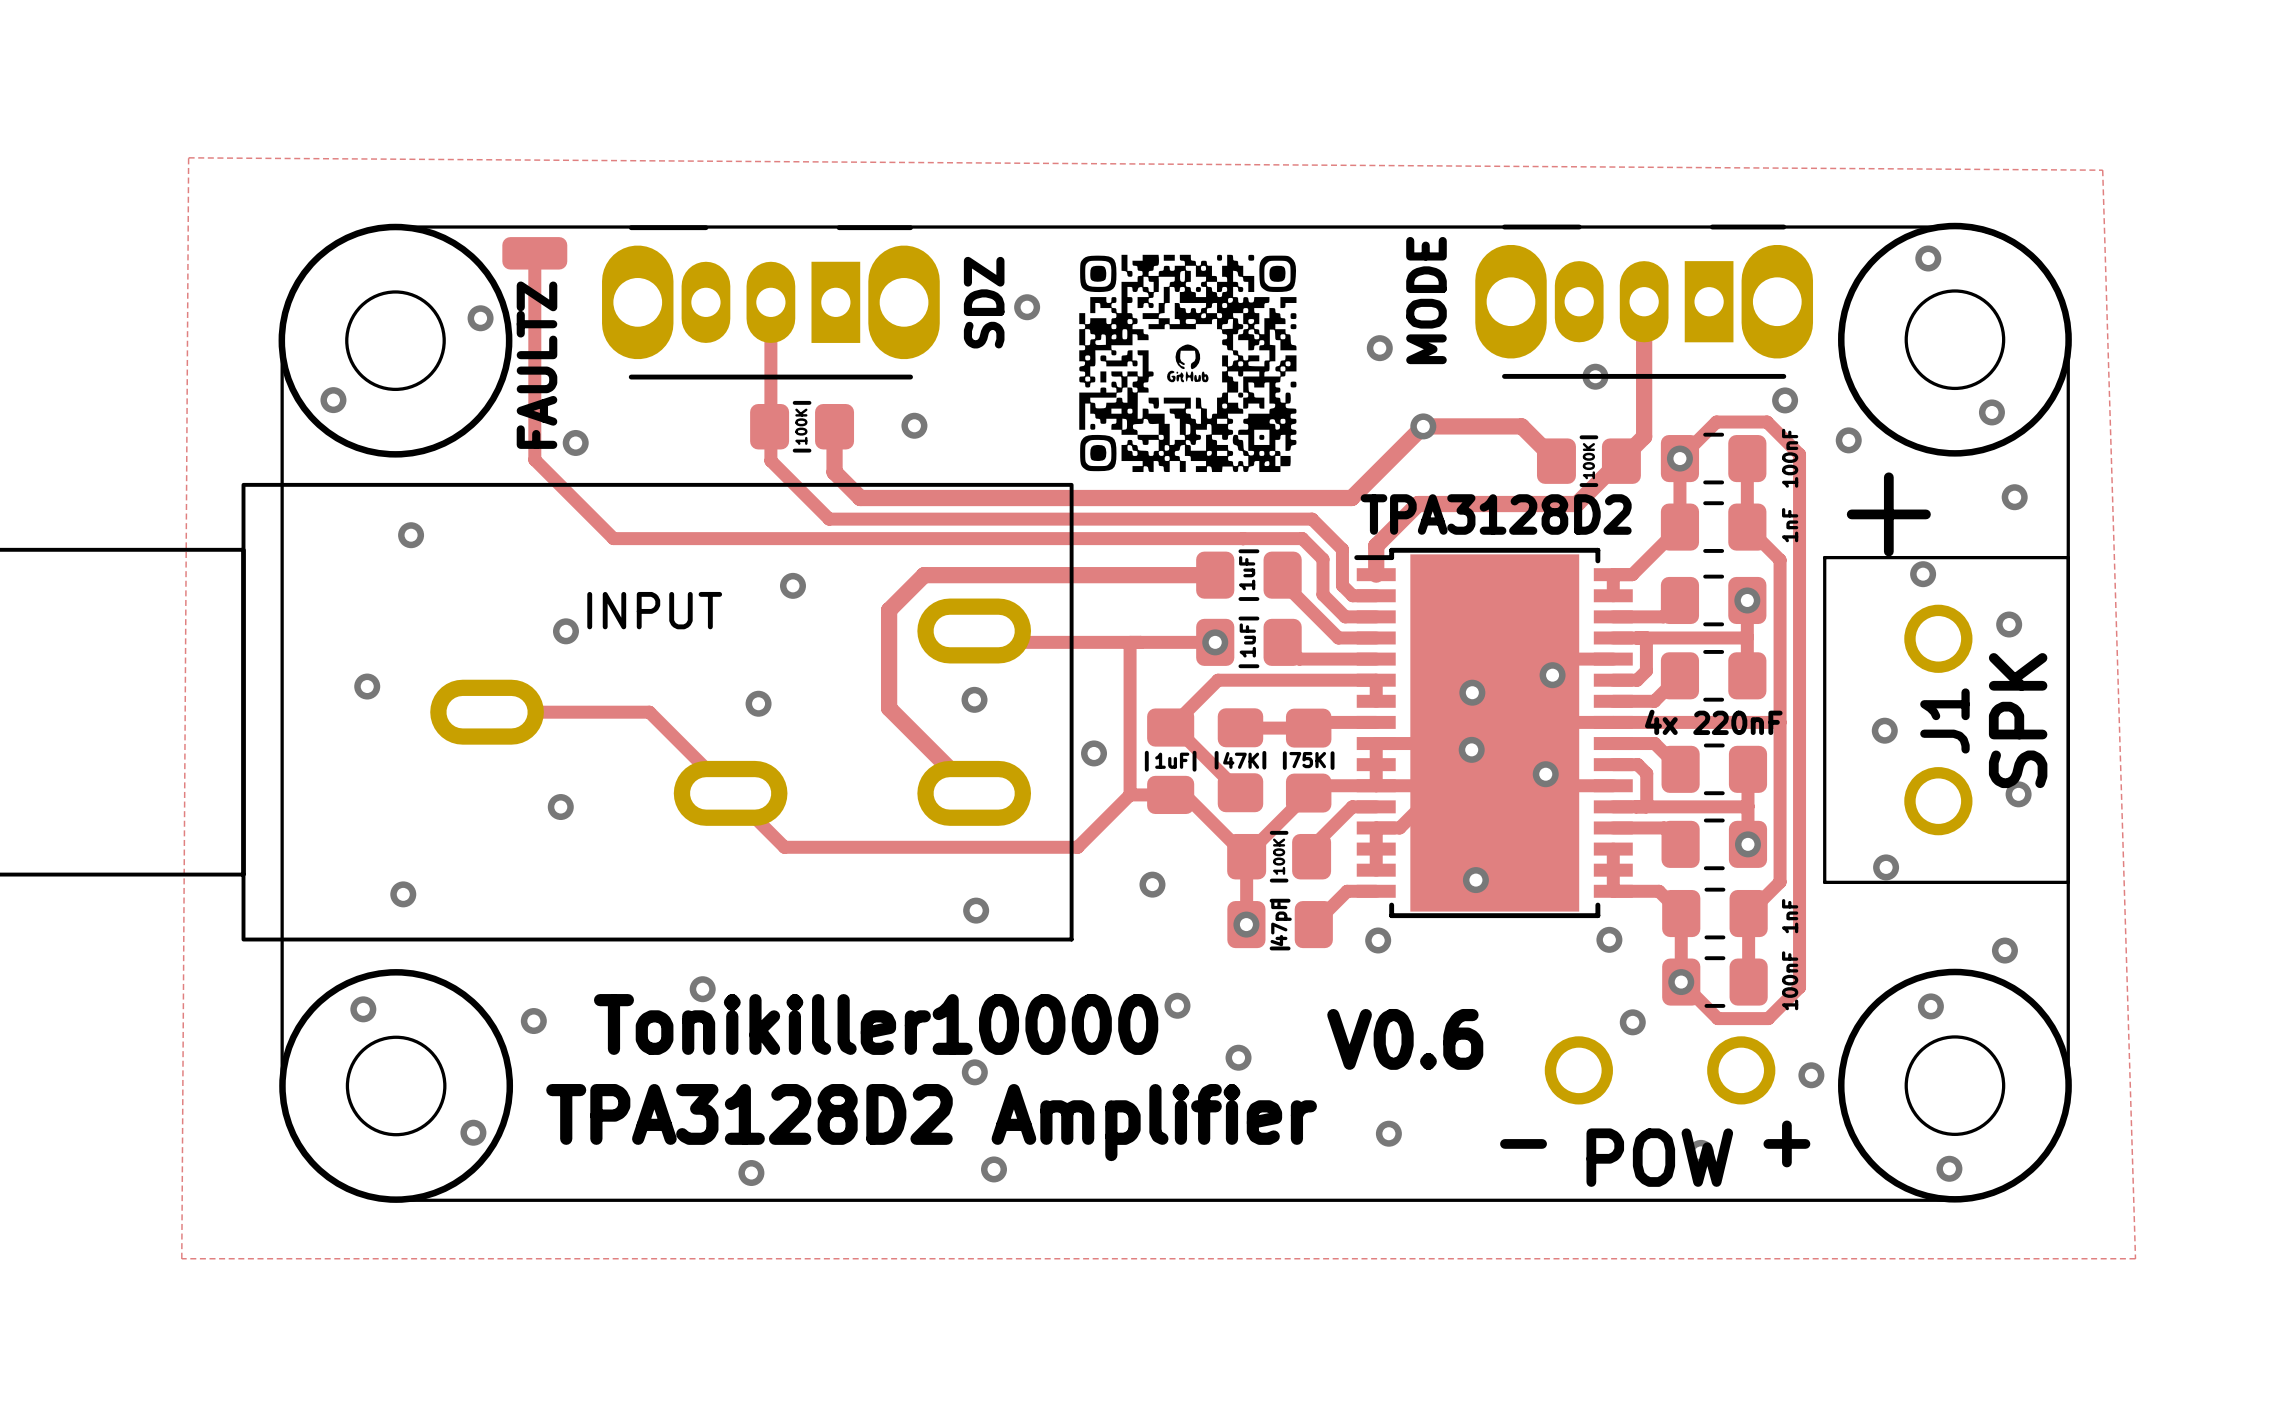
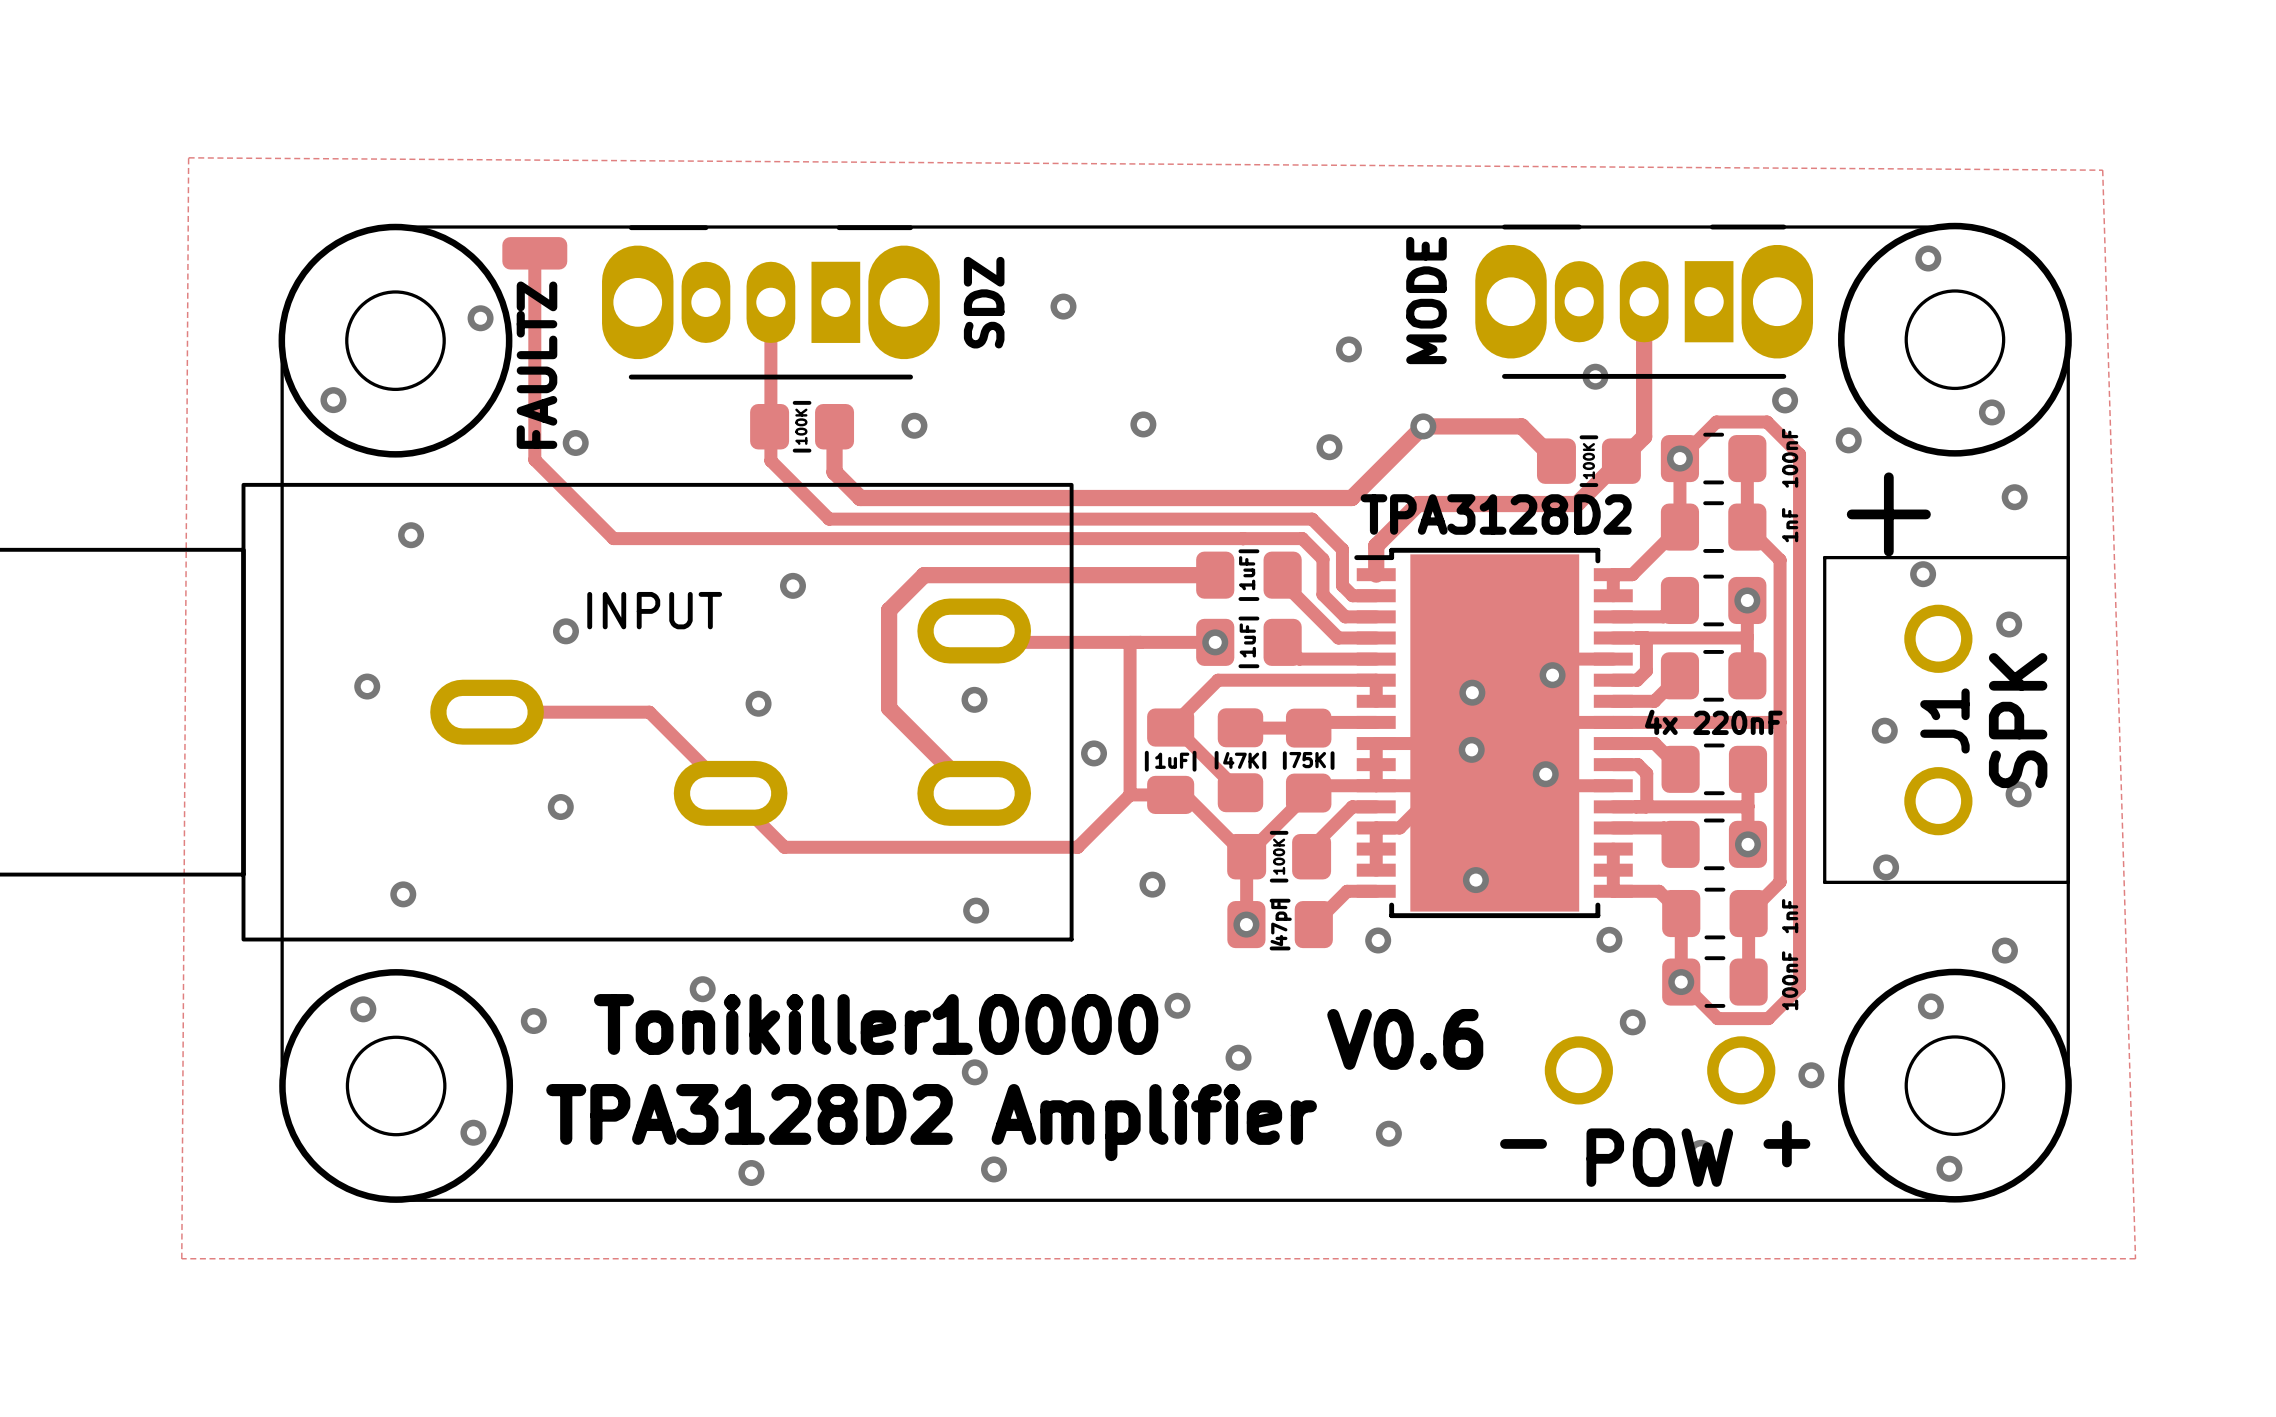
drawing: [1079, 254, 1297, 473] -> none
via position: (1027, 307) -> (1063, 306)
via position: (1379, 348) -> (1348, 349)
via: none -> (1143, 424)
via: none -> (1329, 447)

